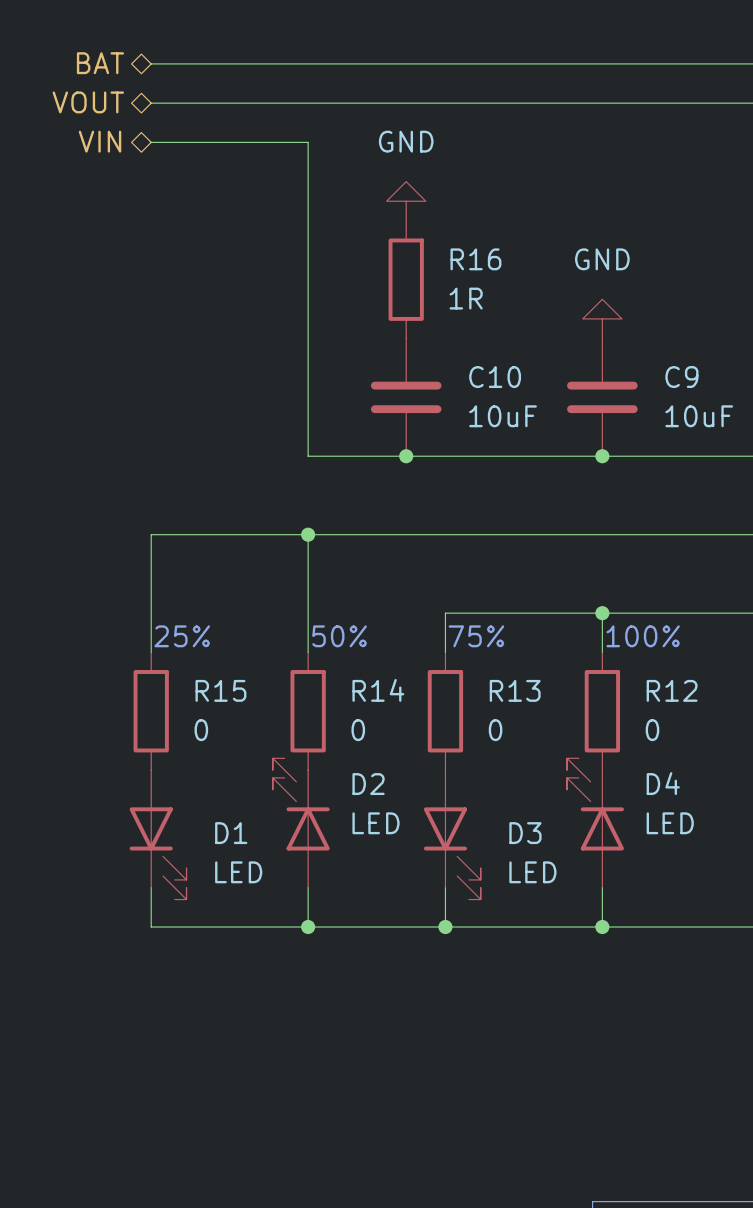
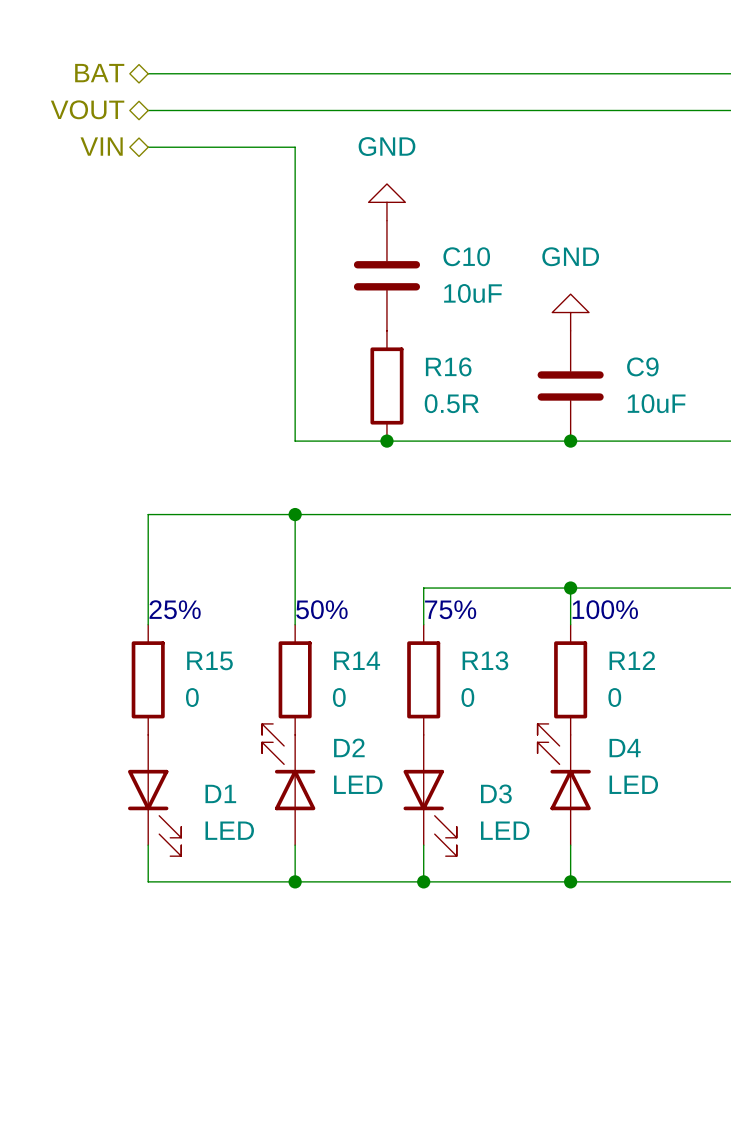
R16 position: (406, 279) -> (386, 385)
R16 value: 1R (466, 298) -> 0.5R (451, 403)
C10 position: (406, 397) -> (386, 275)

